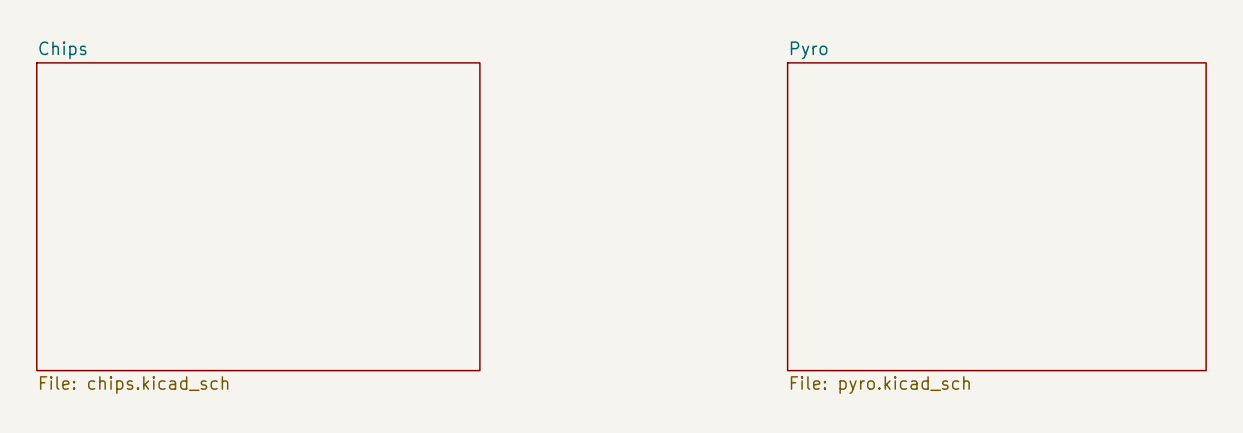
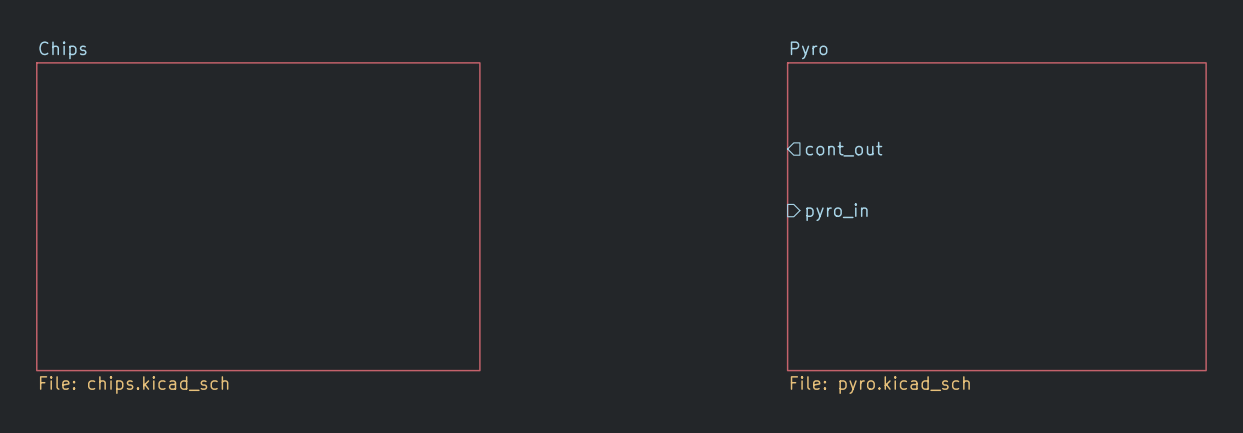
sheet pin: none -> cont_out (844, 149)
sheet pin: none -> pyro_in (837, 212)

